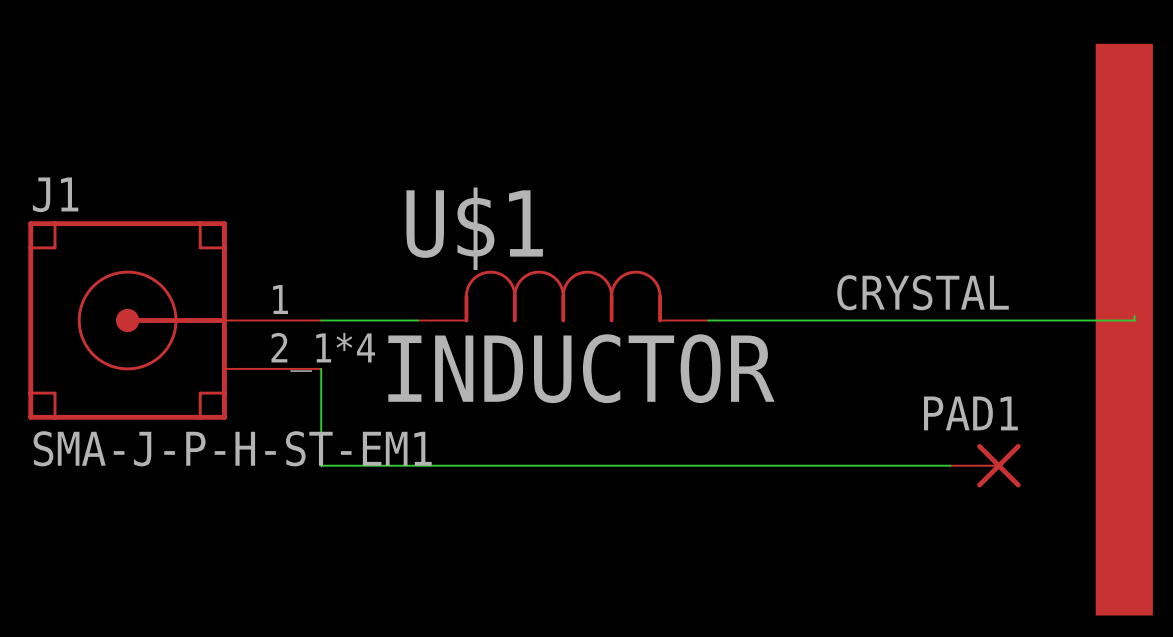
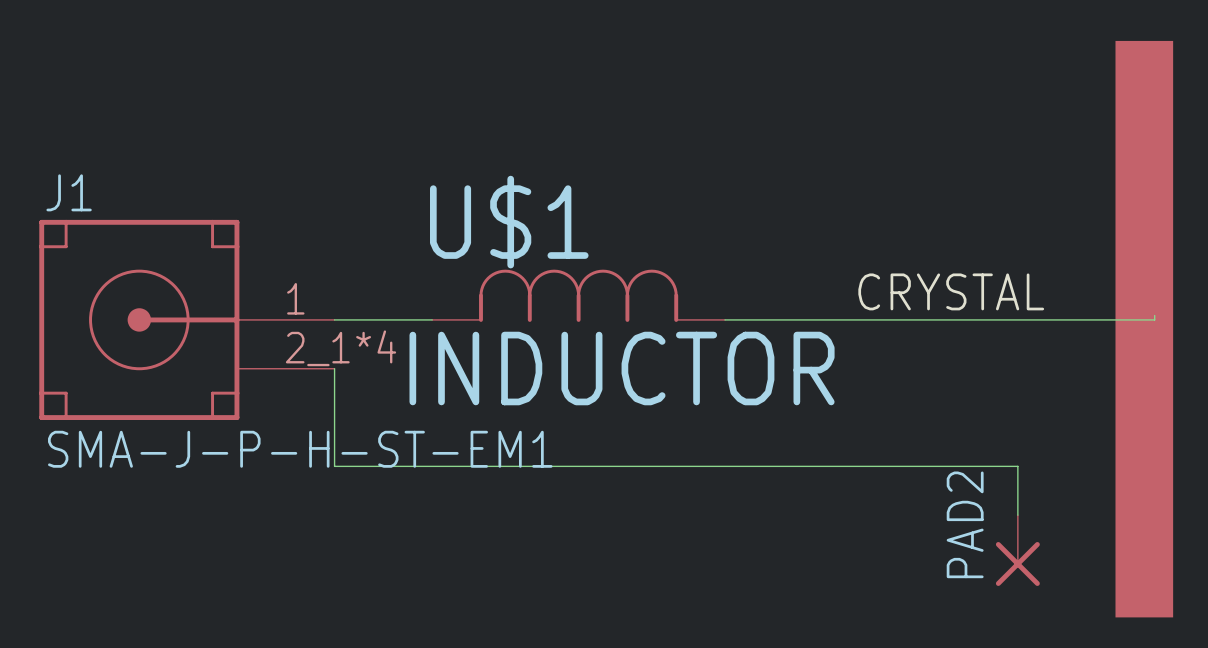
wire: none -> (969, 466) (1017, 466) (1017, 515)
PAD1: (985, 465) -> none
PAD2: none -> (1017, 550)

